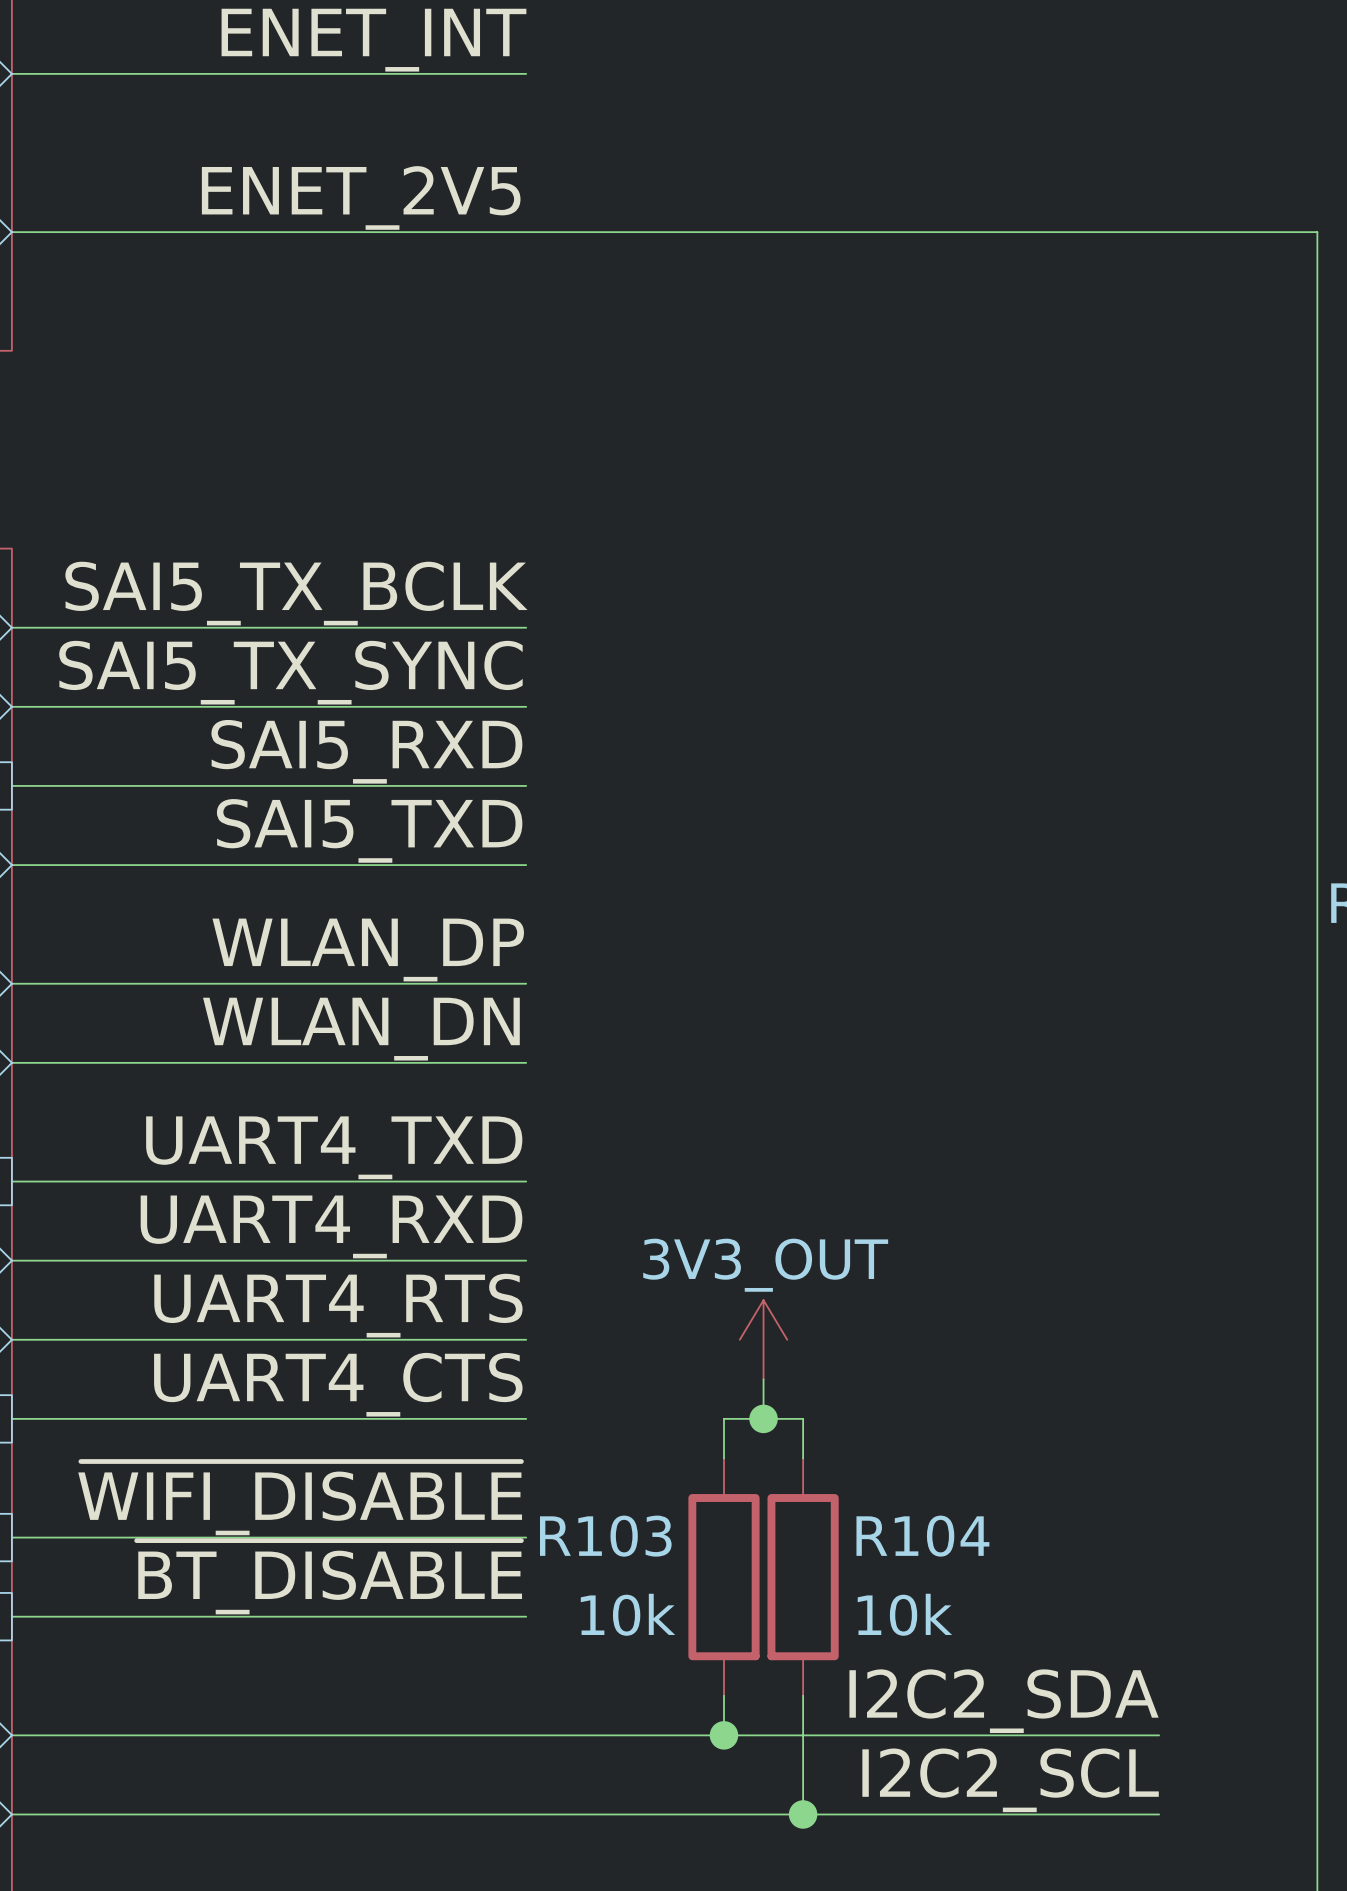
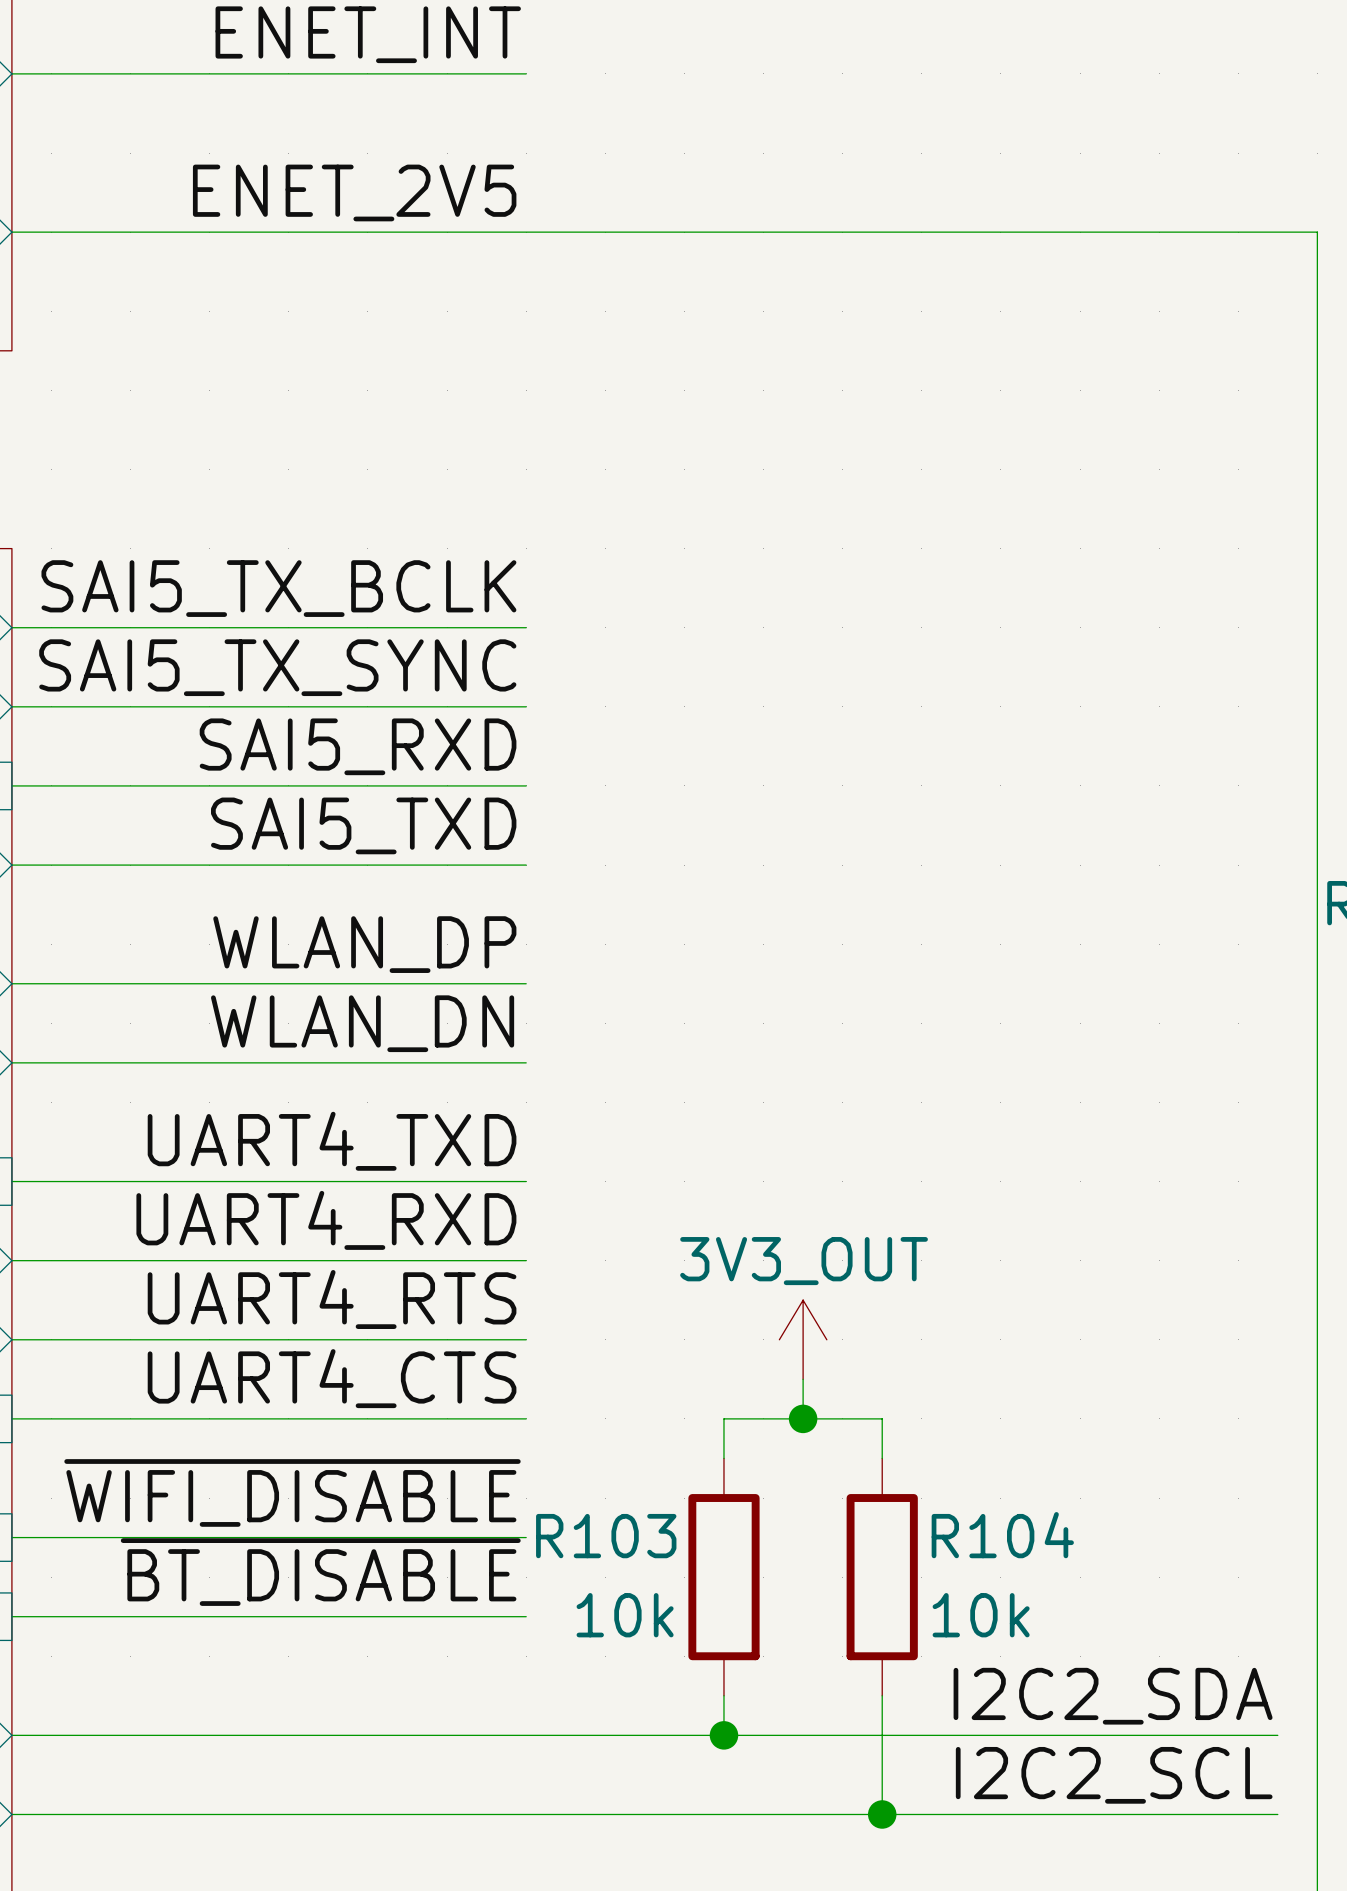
power symbol position: 3V3_OUT (763, 1339) -> 3V3_OUT (803, 1339)
wire: (763, 1379) (763, 1418) -> none
wire: none -> (803, 1379) (803, 1418) (882, 1418) (882, 1458)
junction position: (763, 1418) -> (803, 1418)
wire: (803, 1418) (803, 1458) -> none
R104 position: (803, 1577) -> (882, 1577)
wire: (803, 1695) (803, 1814) -> (882, 1695) (882, 1814)
label position: I2C2_SDA (1004, 1701) -> I2C2_SDA (1113, 1696)
wire: none -> (1159, 1735) (1277, 1735)
label position: I2C2_SCL (1010, 1780) -> I2C2_SCL (1114, 1775)
junction position: (803, 1814) -> (882, 1814)
wire: none -> (1159, 1814) (1277, 1814)

